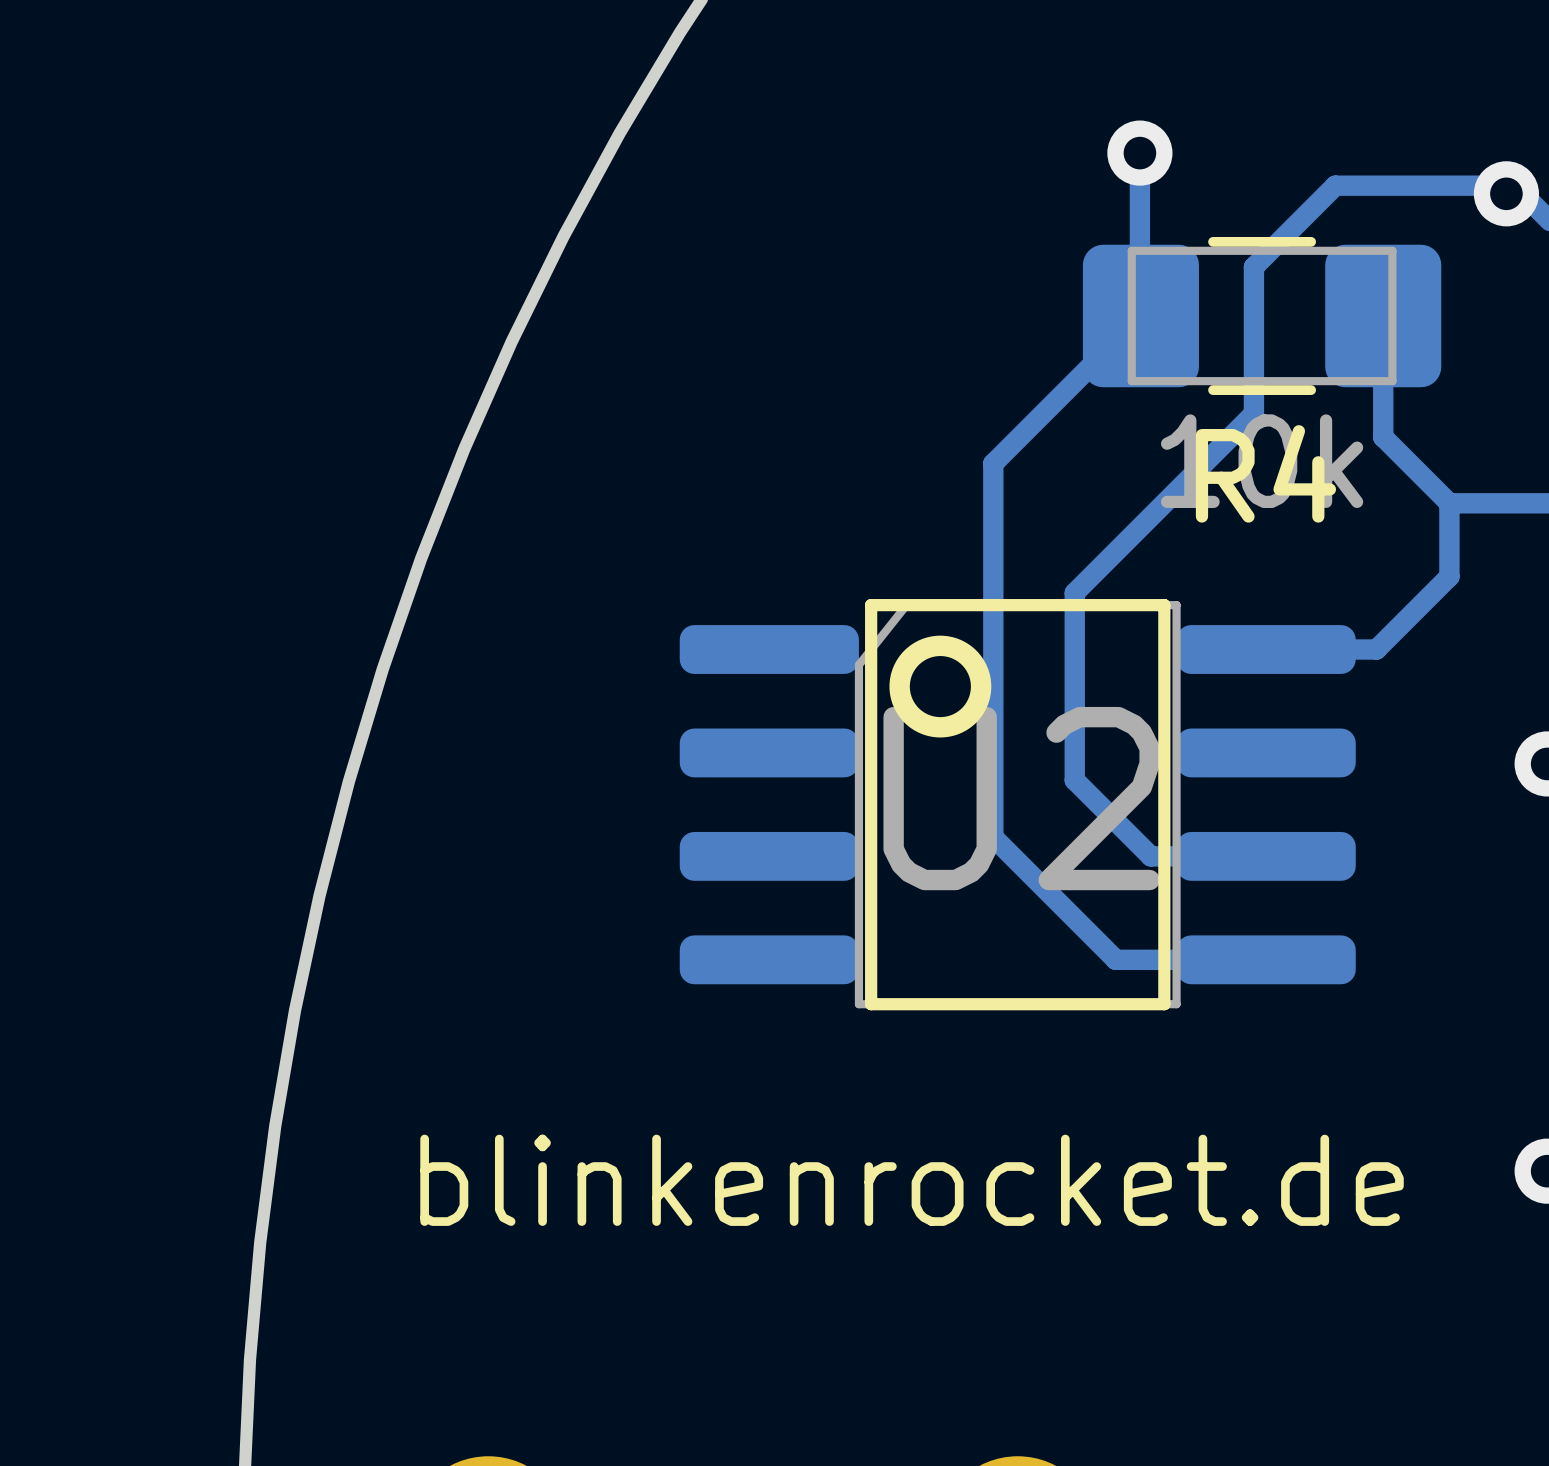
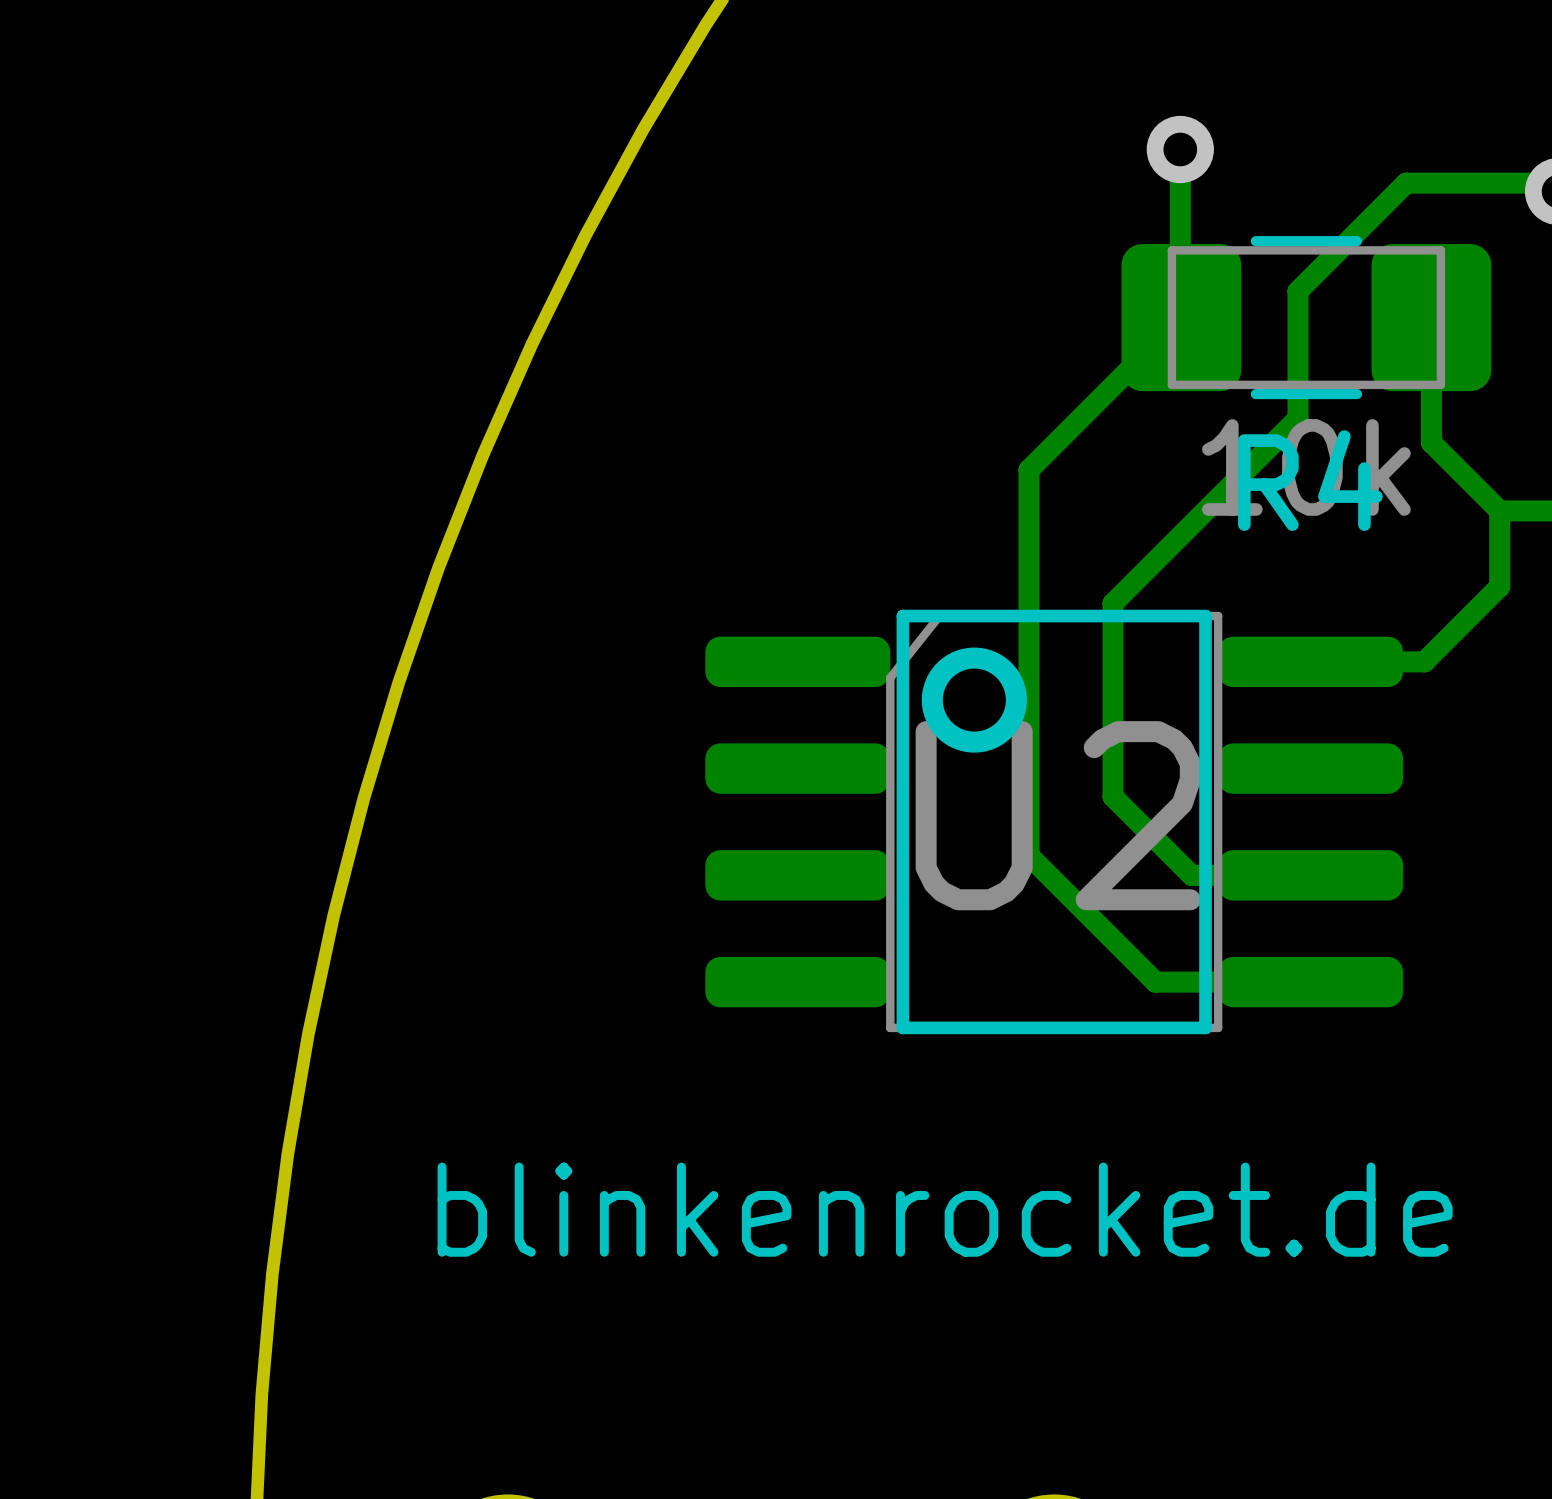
track: (1358, 185) (1335, 185) (1253, 267) (1253, 290) -> (1406, 183) (1297, 291)

